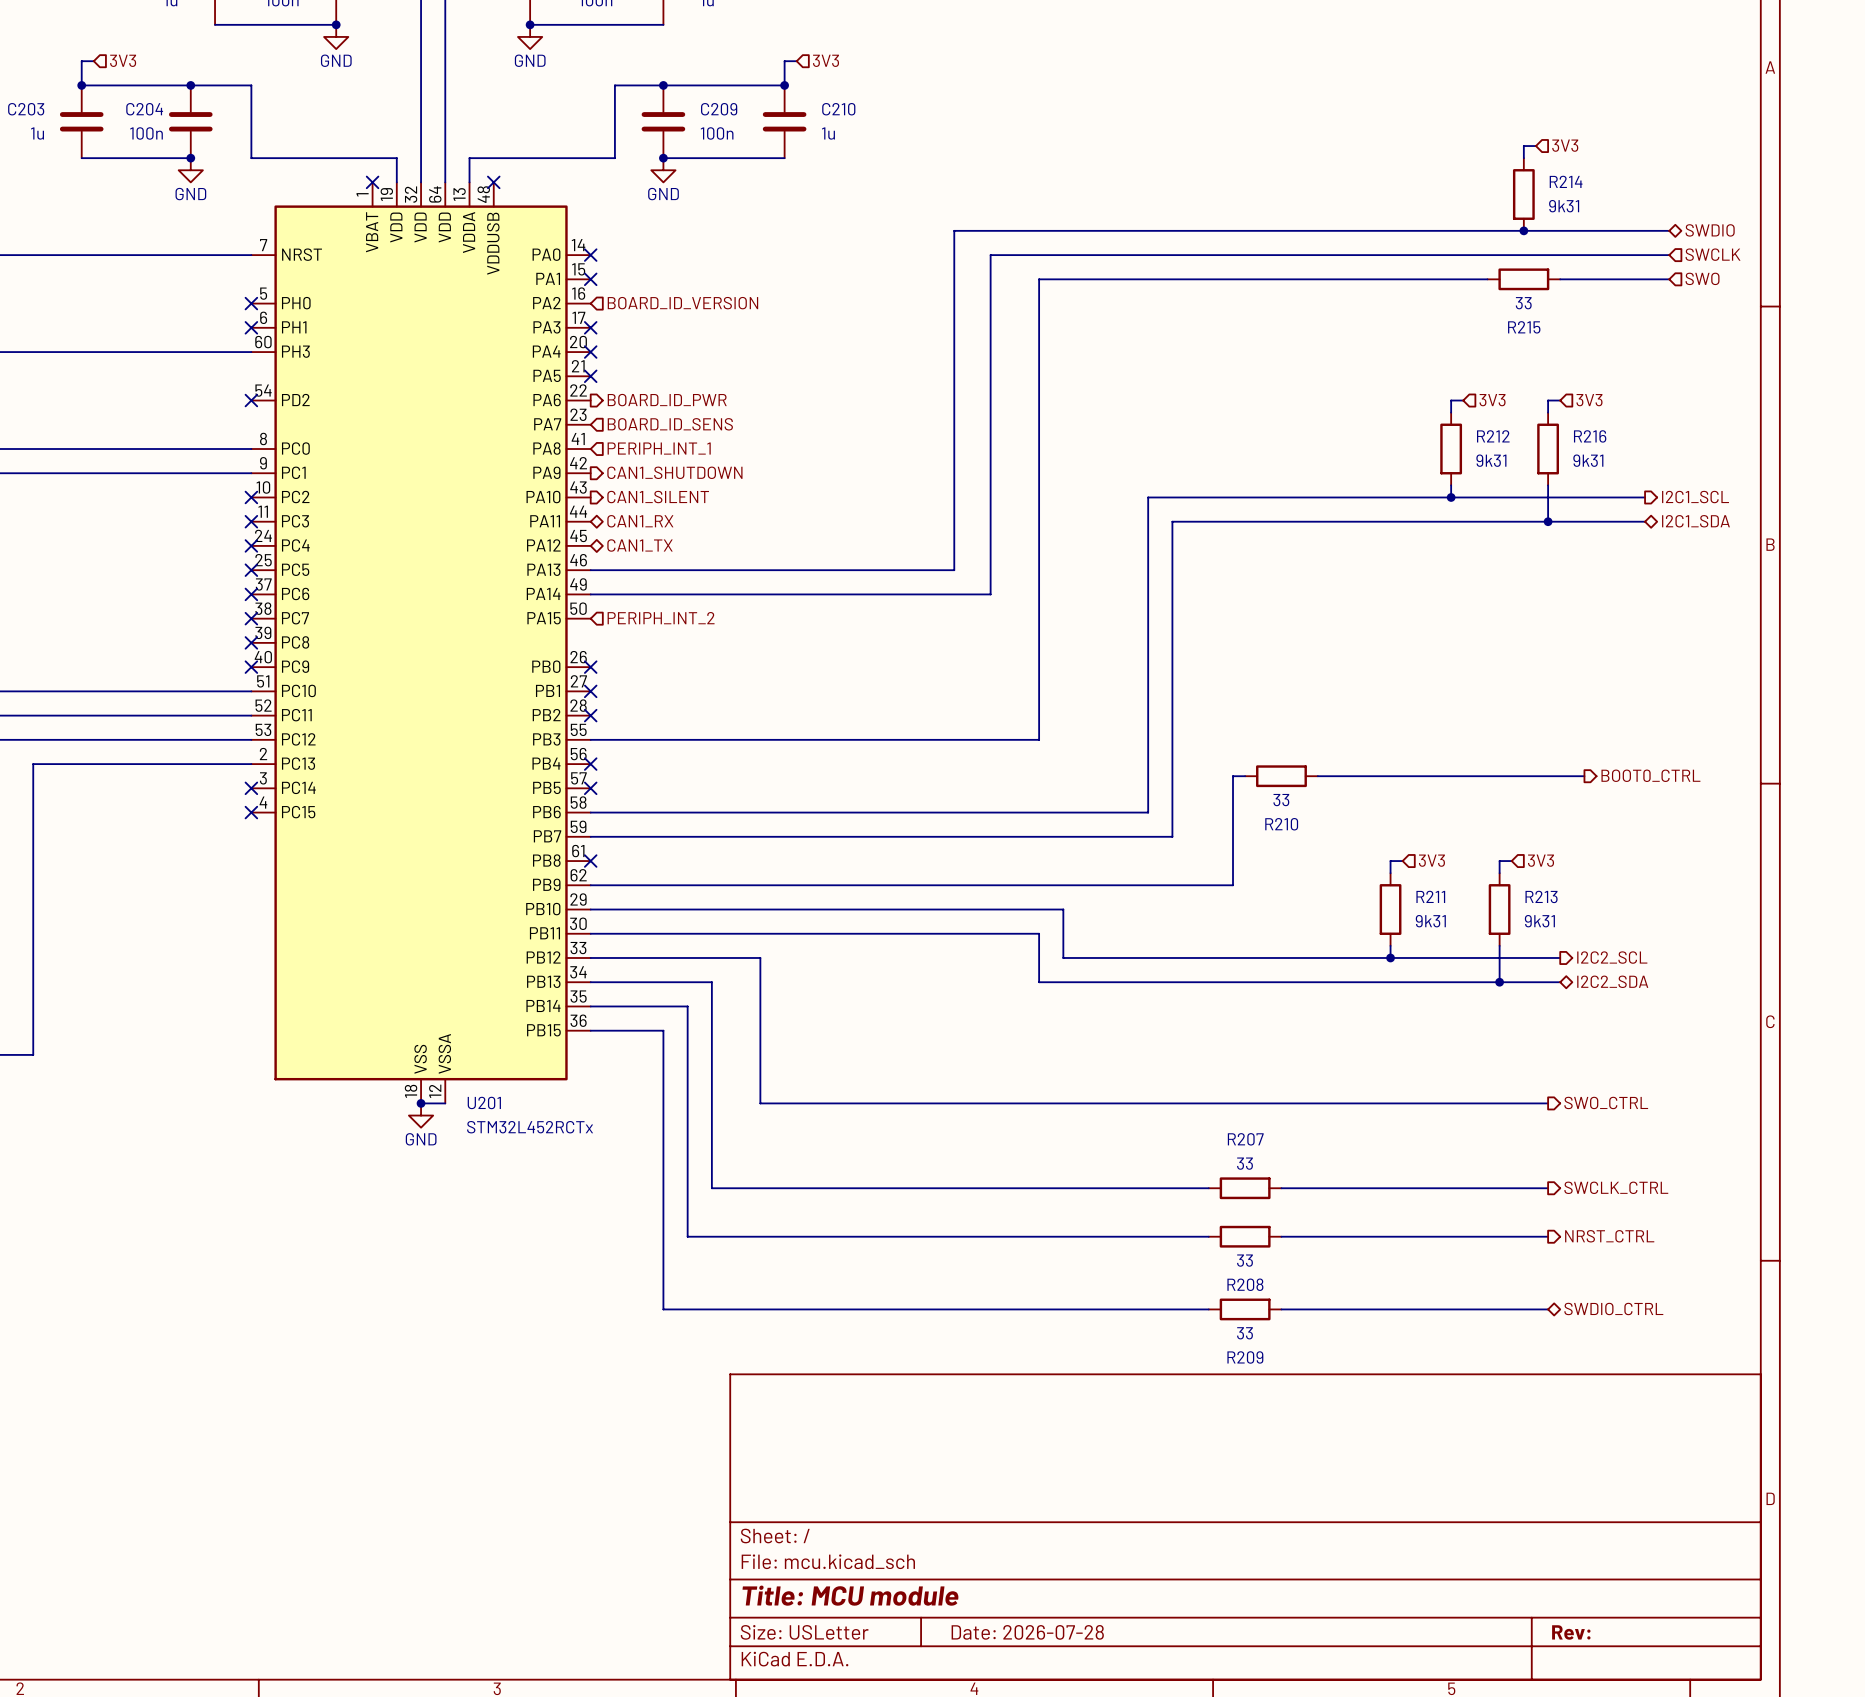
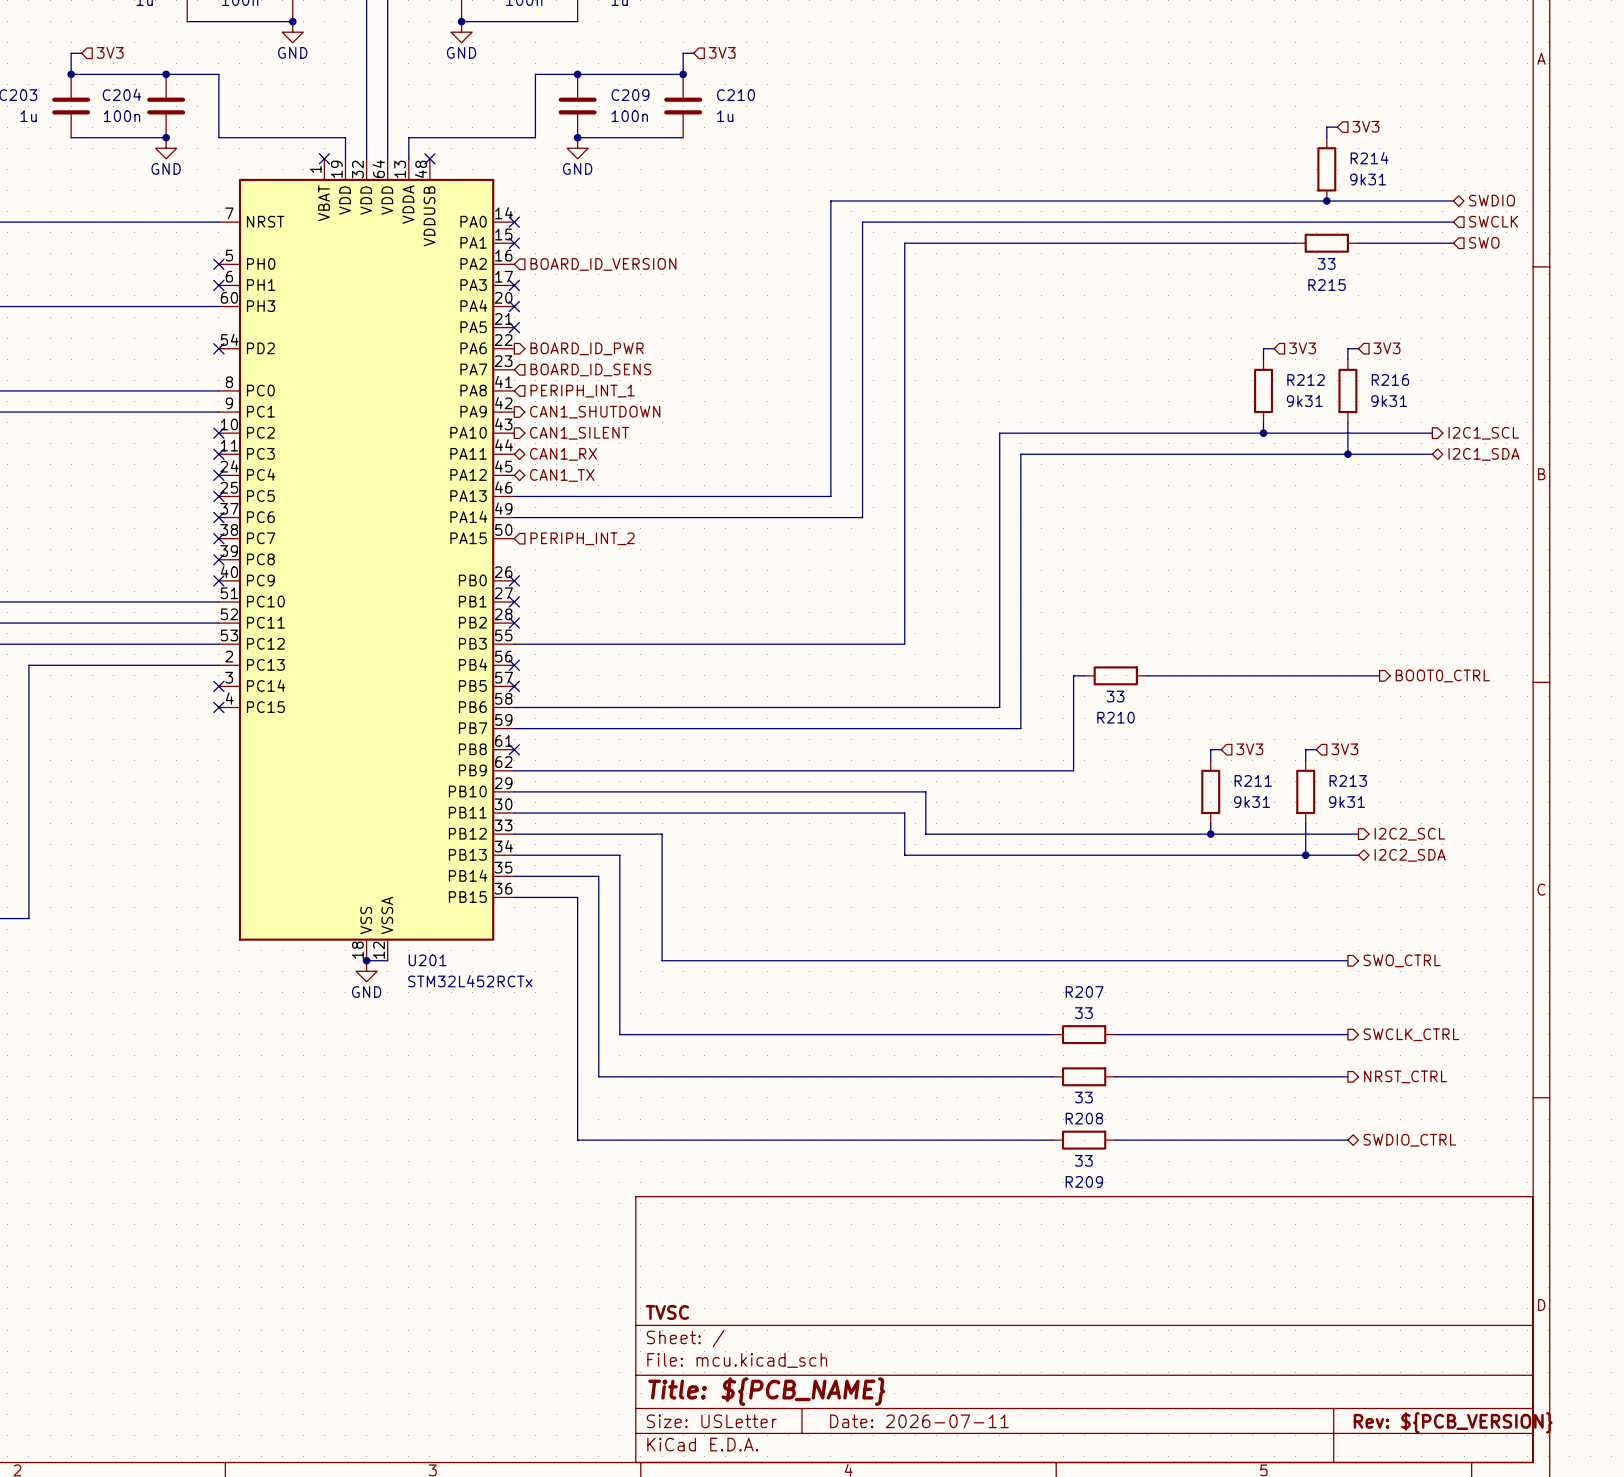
title block: none -> TVSC (667, 1312)
title block: Title: MCU module (850, 1595) -> Title: ${PCB_NAME} (766, 1391)
title block: Date: 2026-07-28 (1027, 1632) -> Date: 2026-07-11 (919, 1421)
title block: Rev: (1571, 1632) -> Rev: ${PCB_VERSION} (1453, 1422)

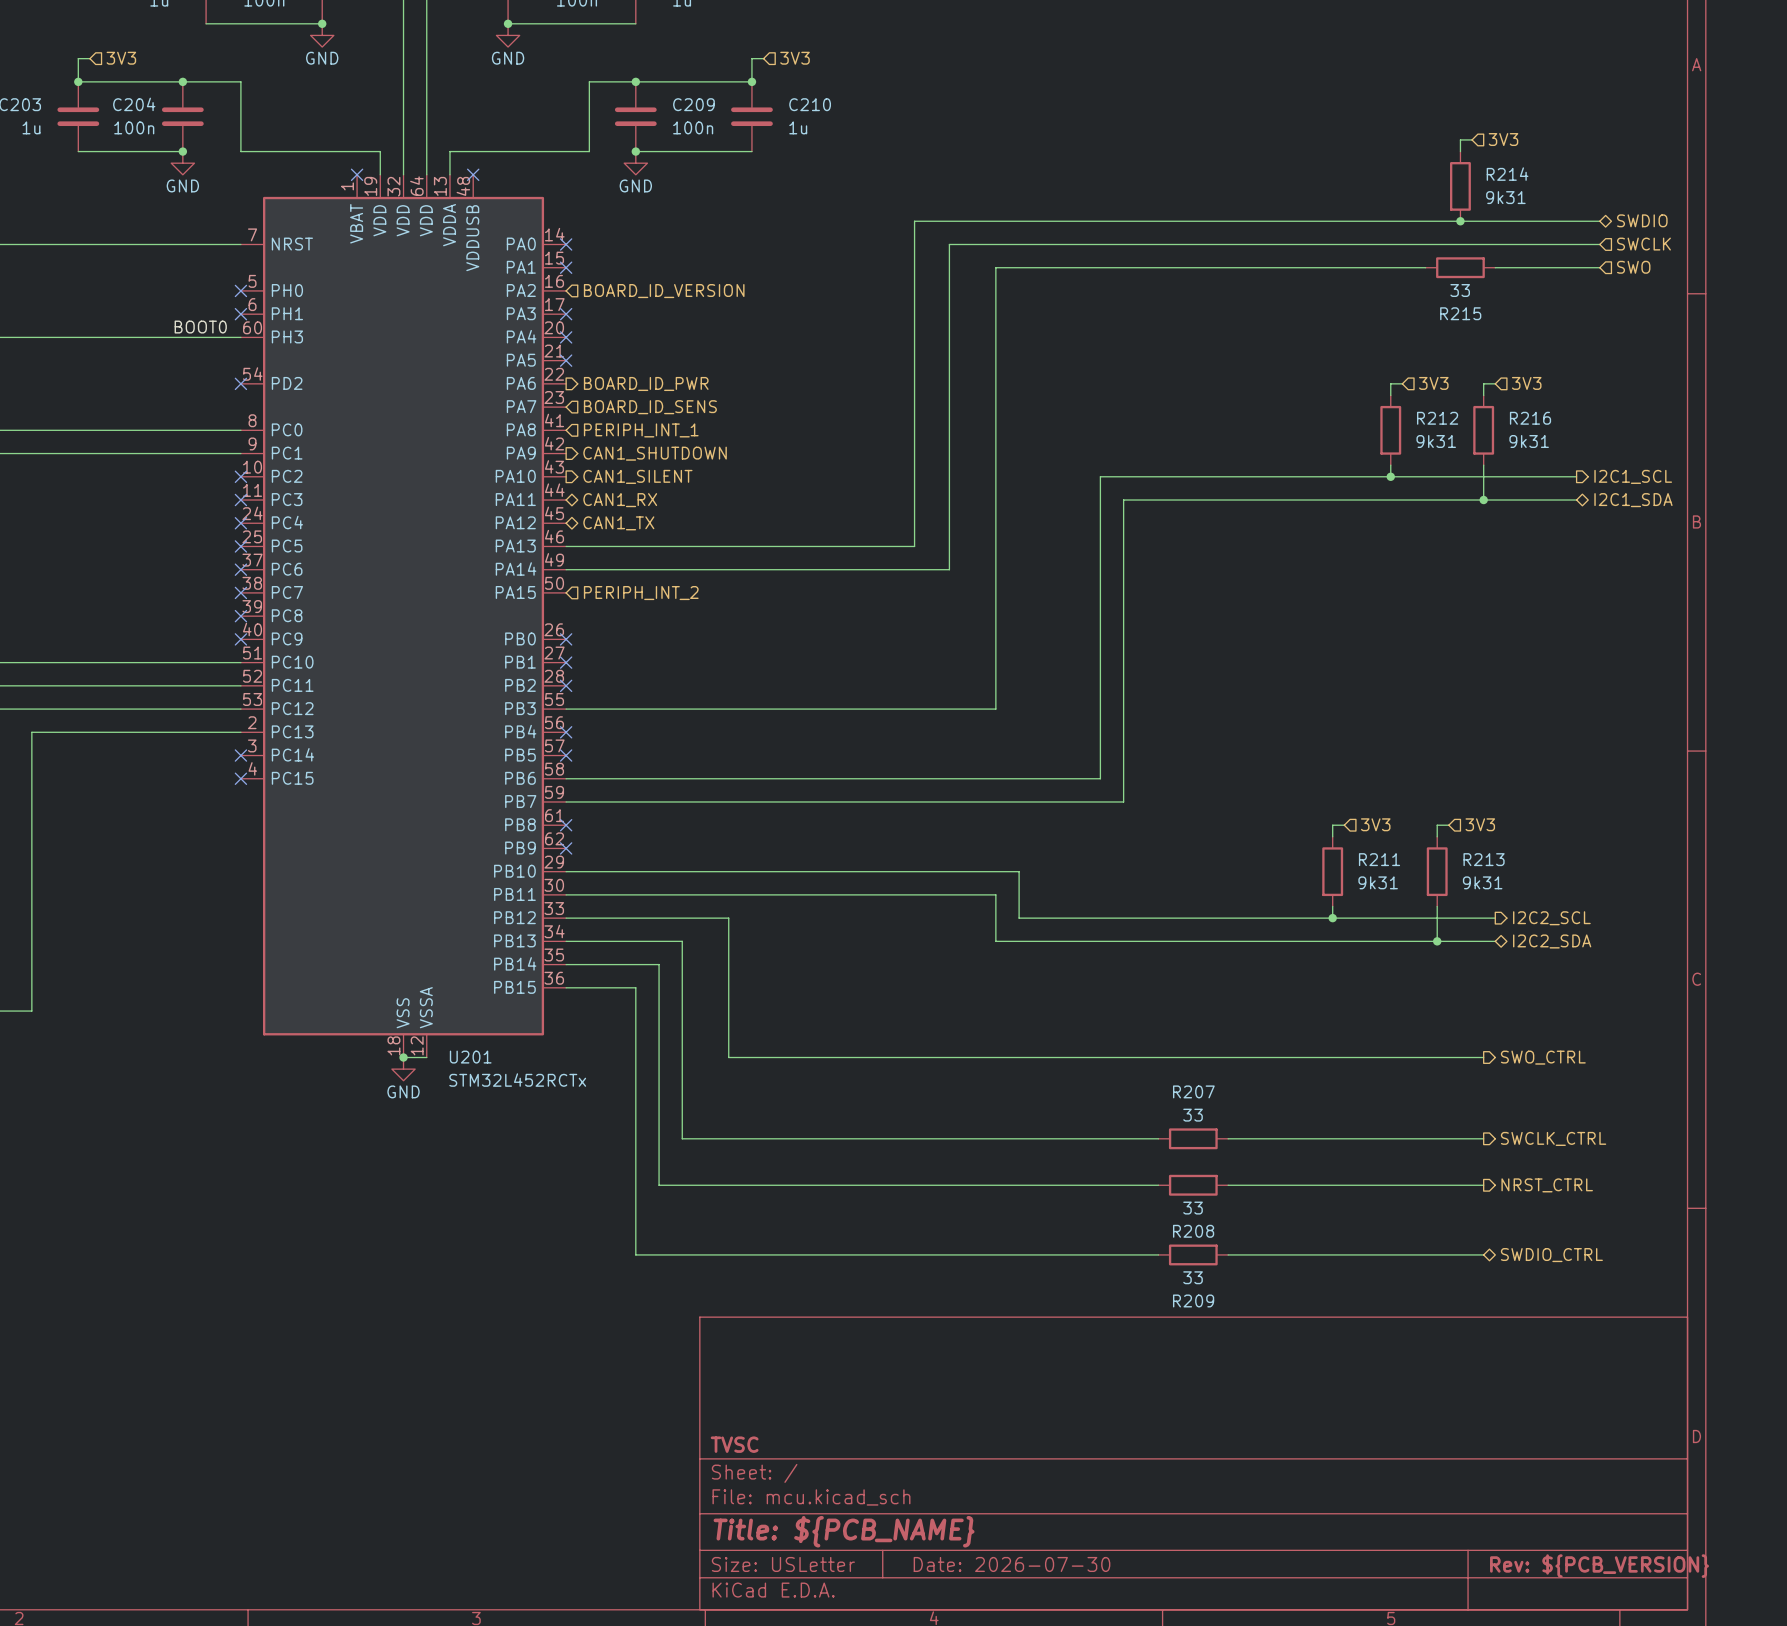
label: none -> BOOT0 (200, 327)
wire: (1084, 675) (1073, 675) (1073, 770) (514, 770) -> none
R210: 33 (1115, 675) -> none
wire: (1147, 675) (1379, 675) -> none
hierarchical label: BOOT0_CTRL (1442, 675) -> none
no-connect mark: none -> (566, 848)
title block: Date: 2026-07-11 (919, 1421) -> Date: 2026-07-30 (1012, 1564)

